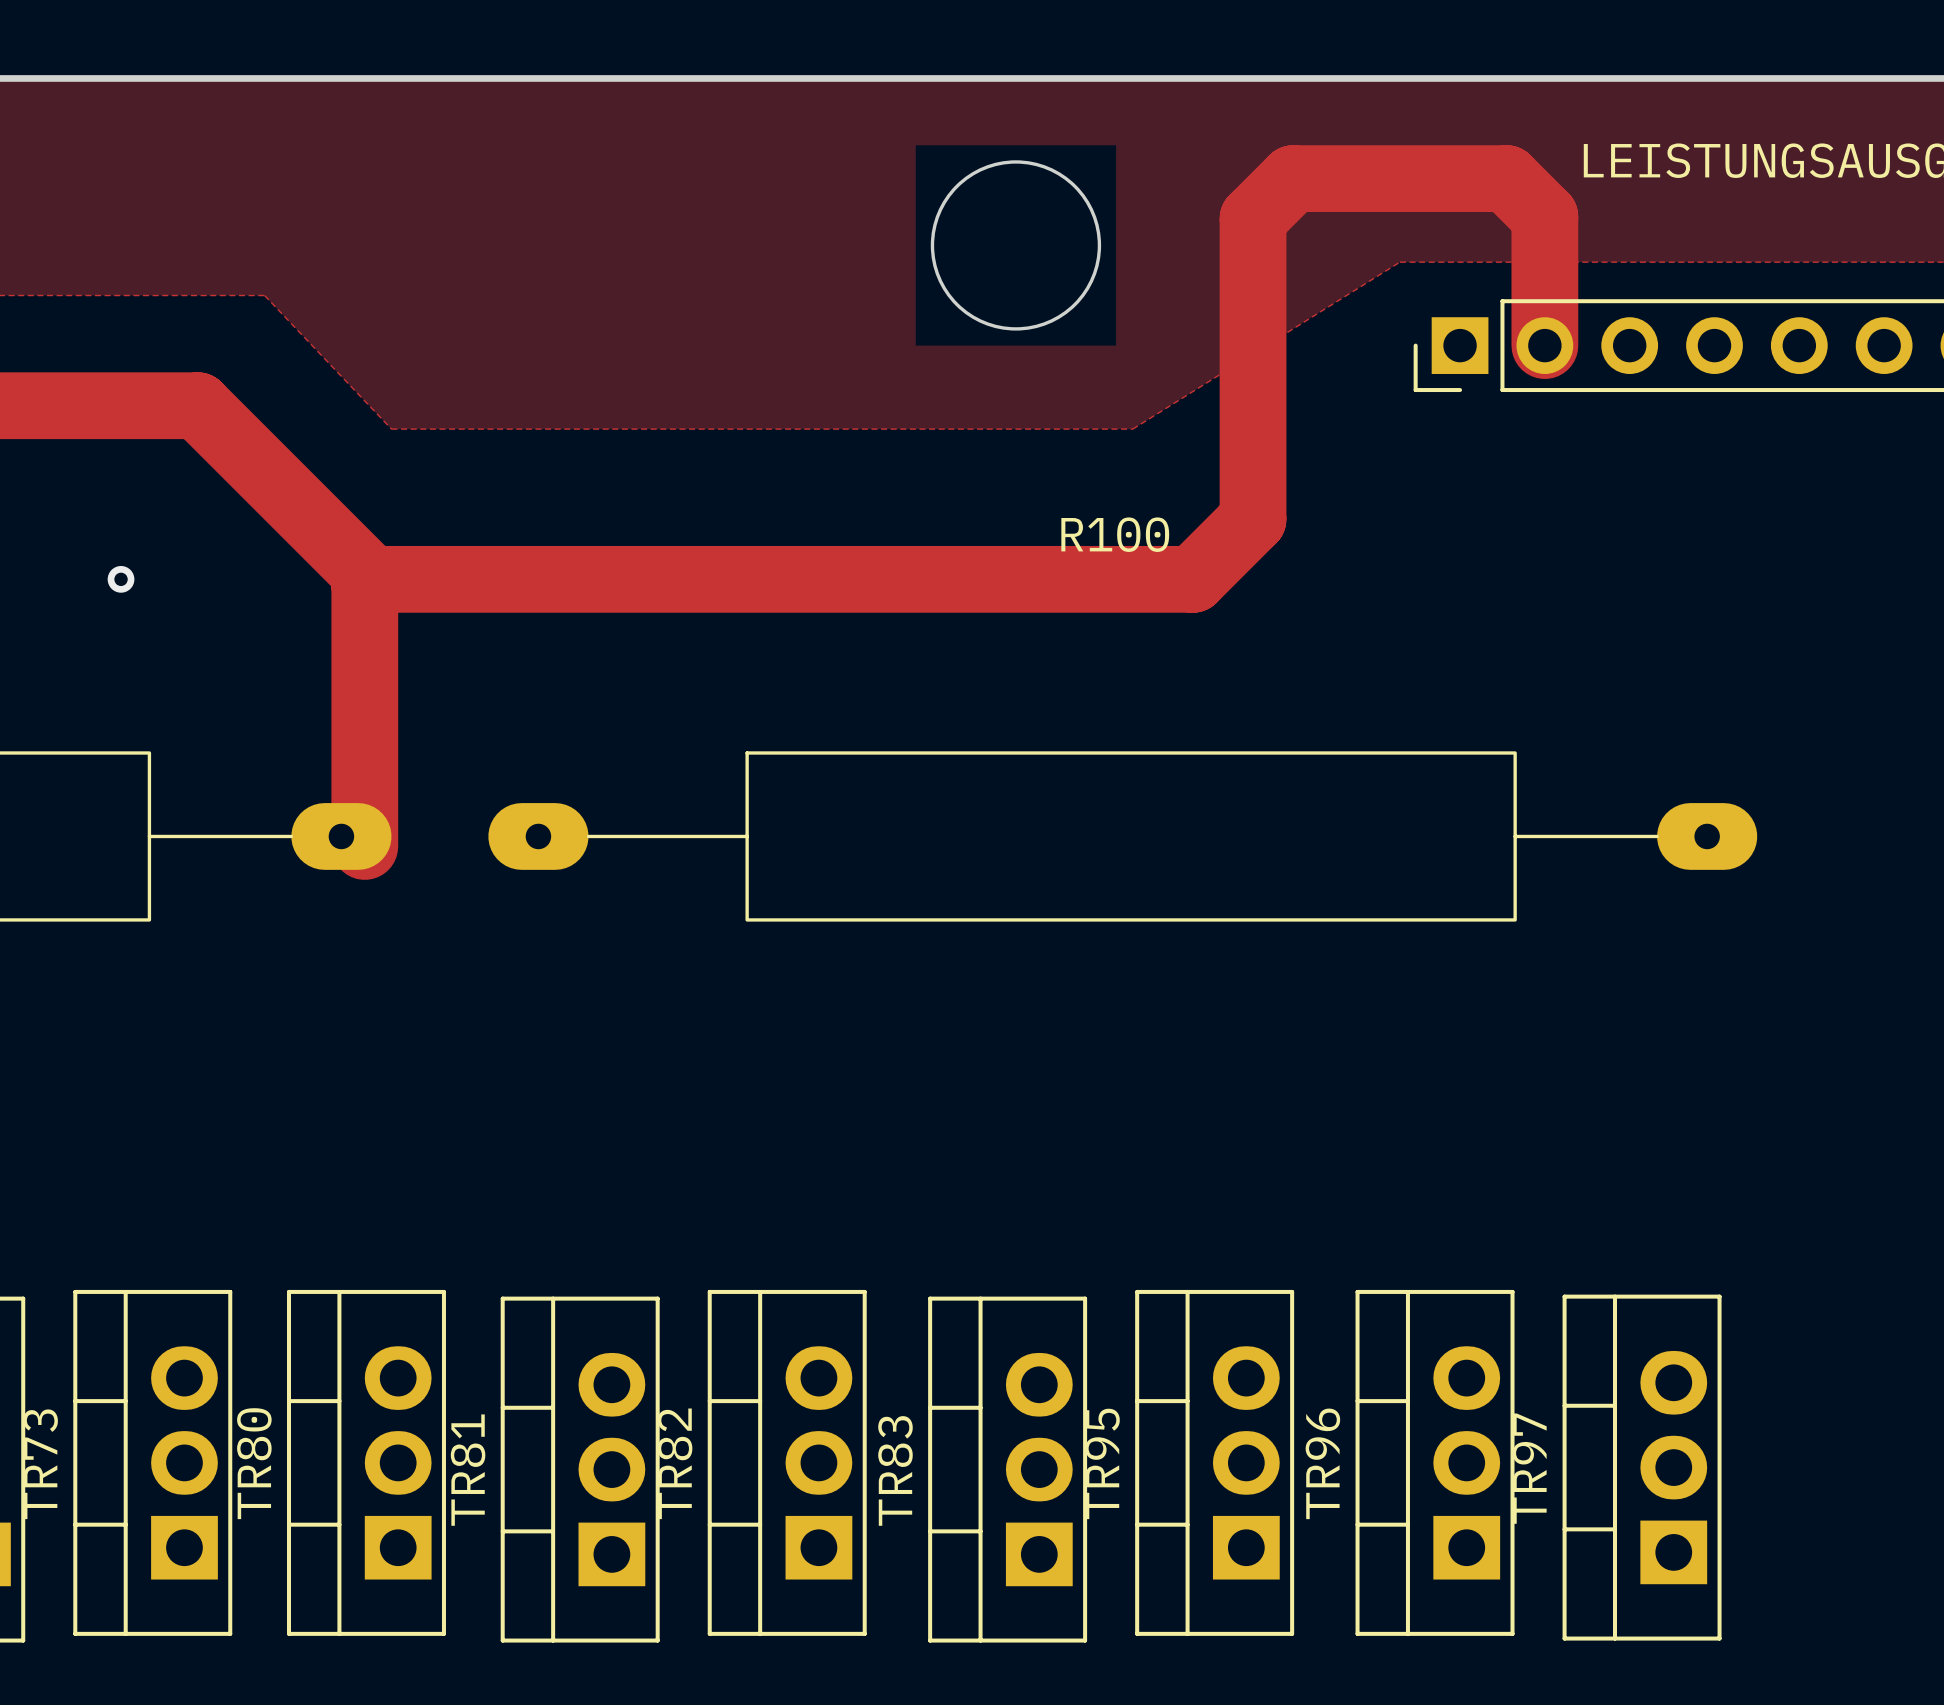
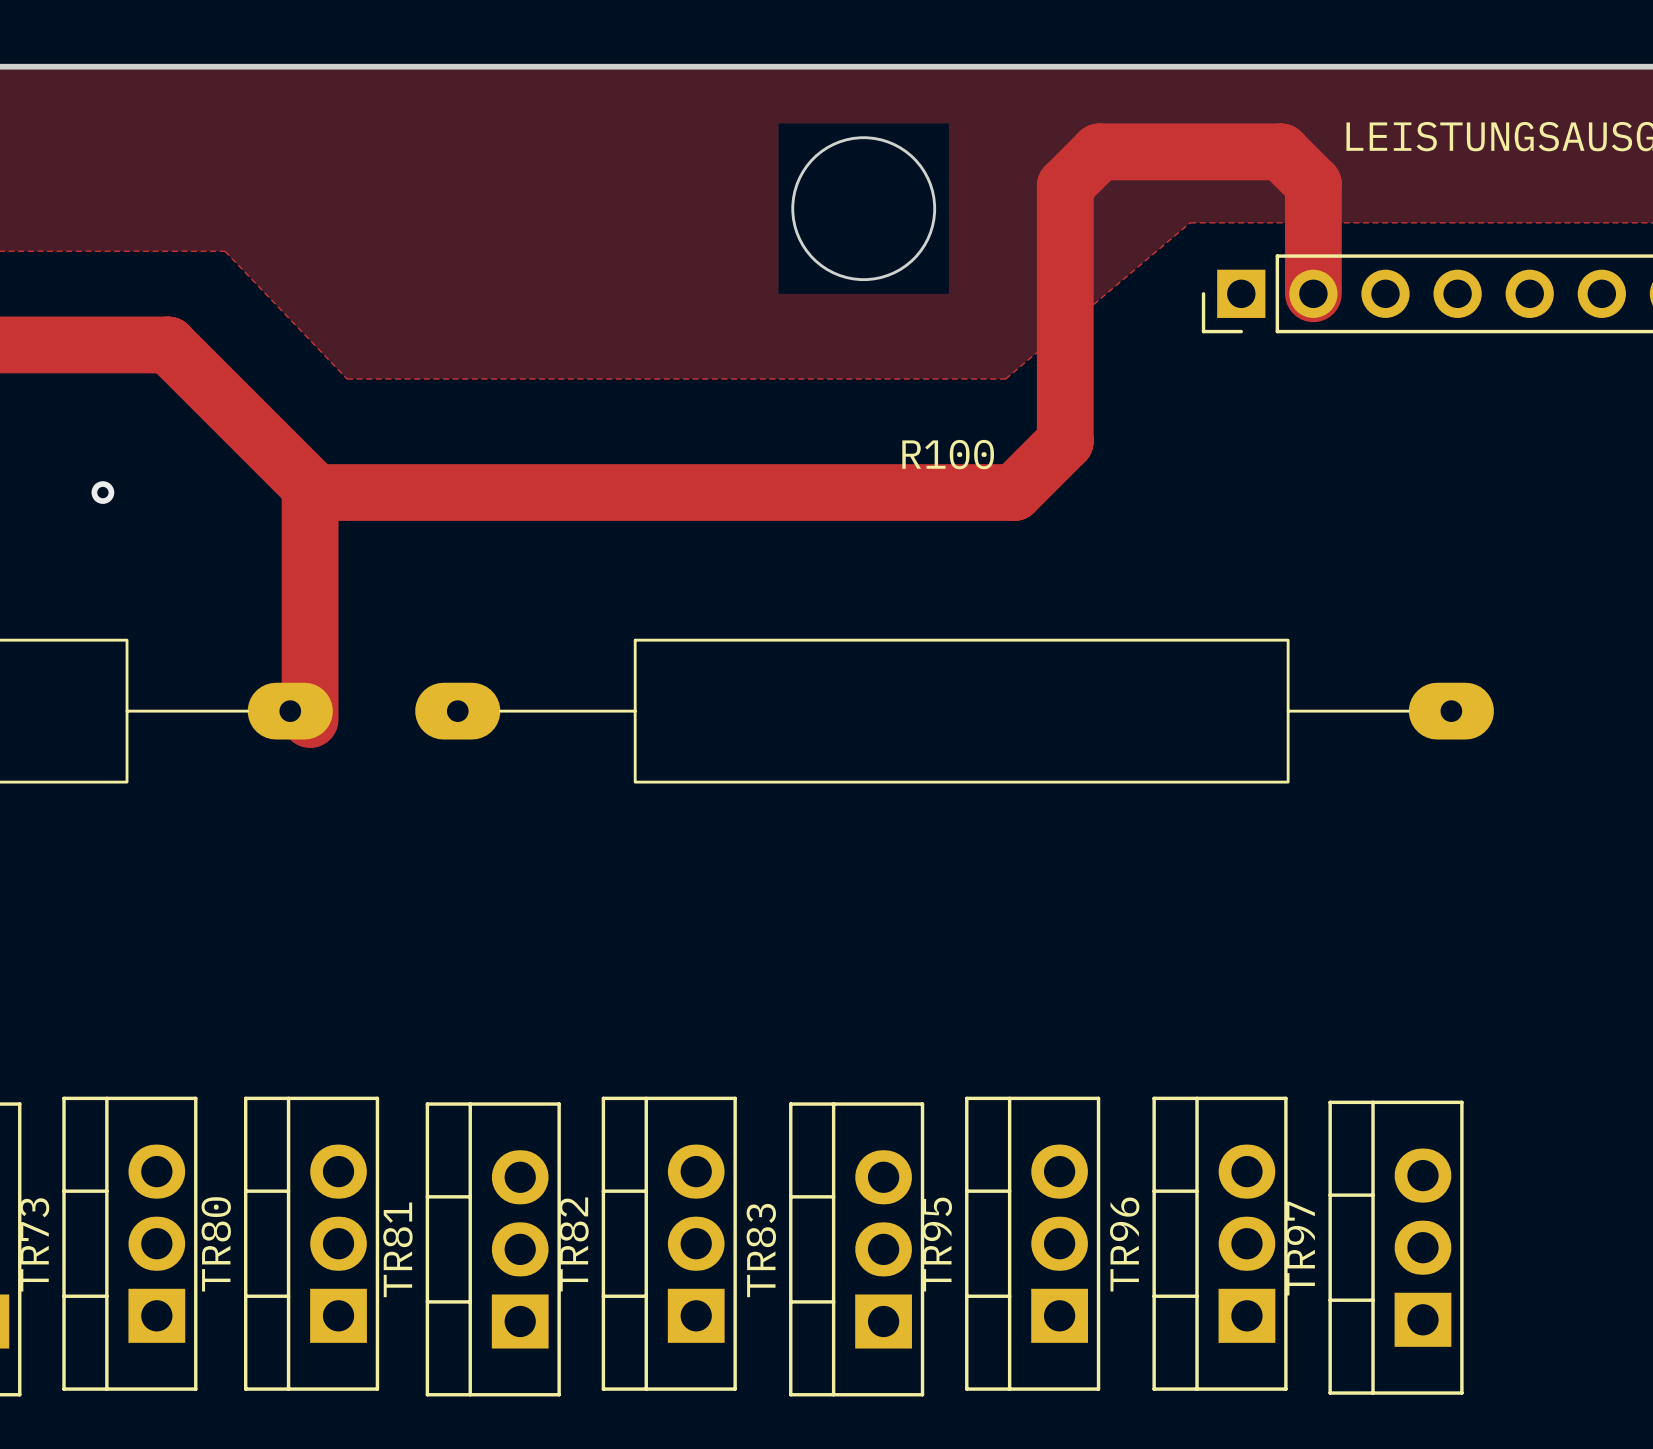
zone outline: (1399, 262) (1132, 429) (391, 429) (264, 295) -> (1190, 222) (1005, 378) (347, 378) (224, 251)

